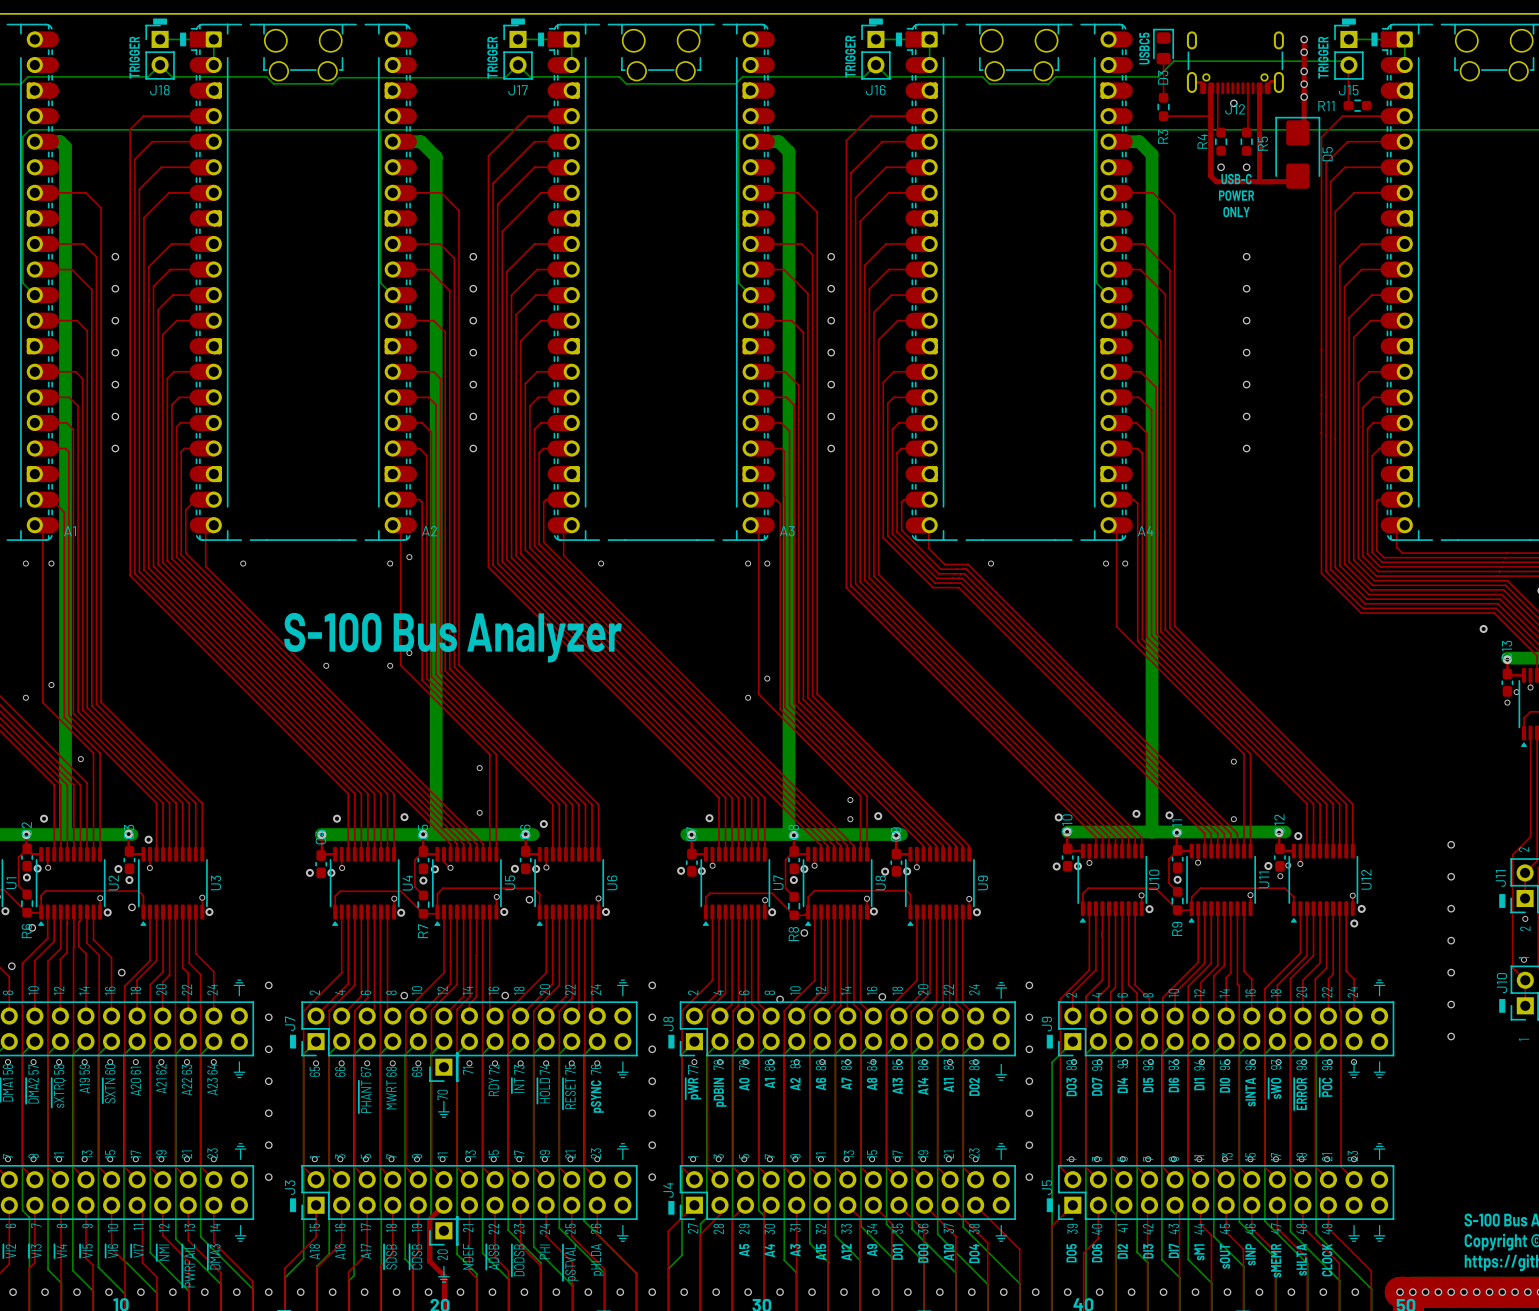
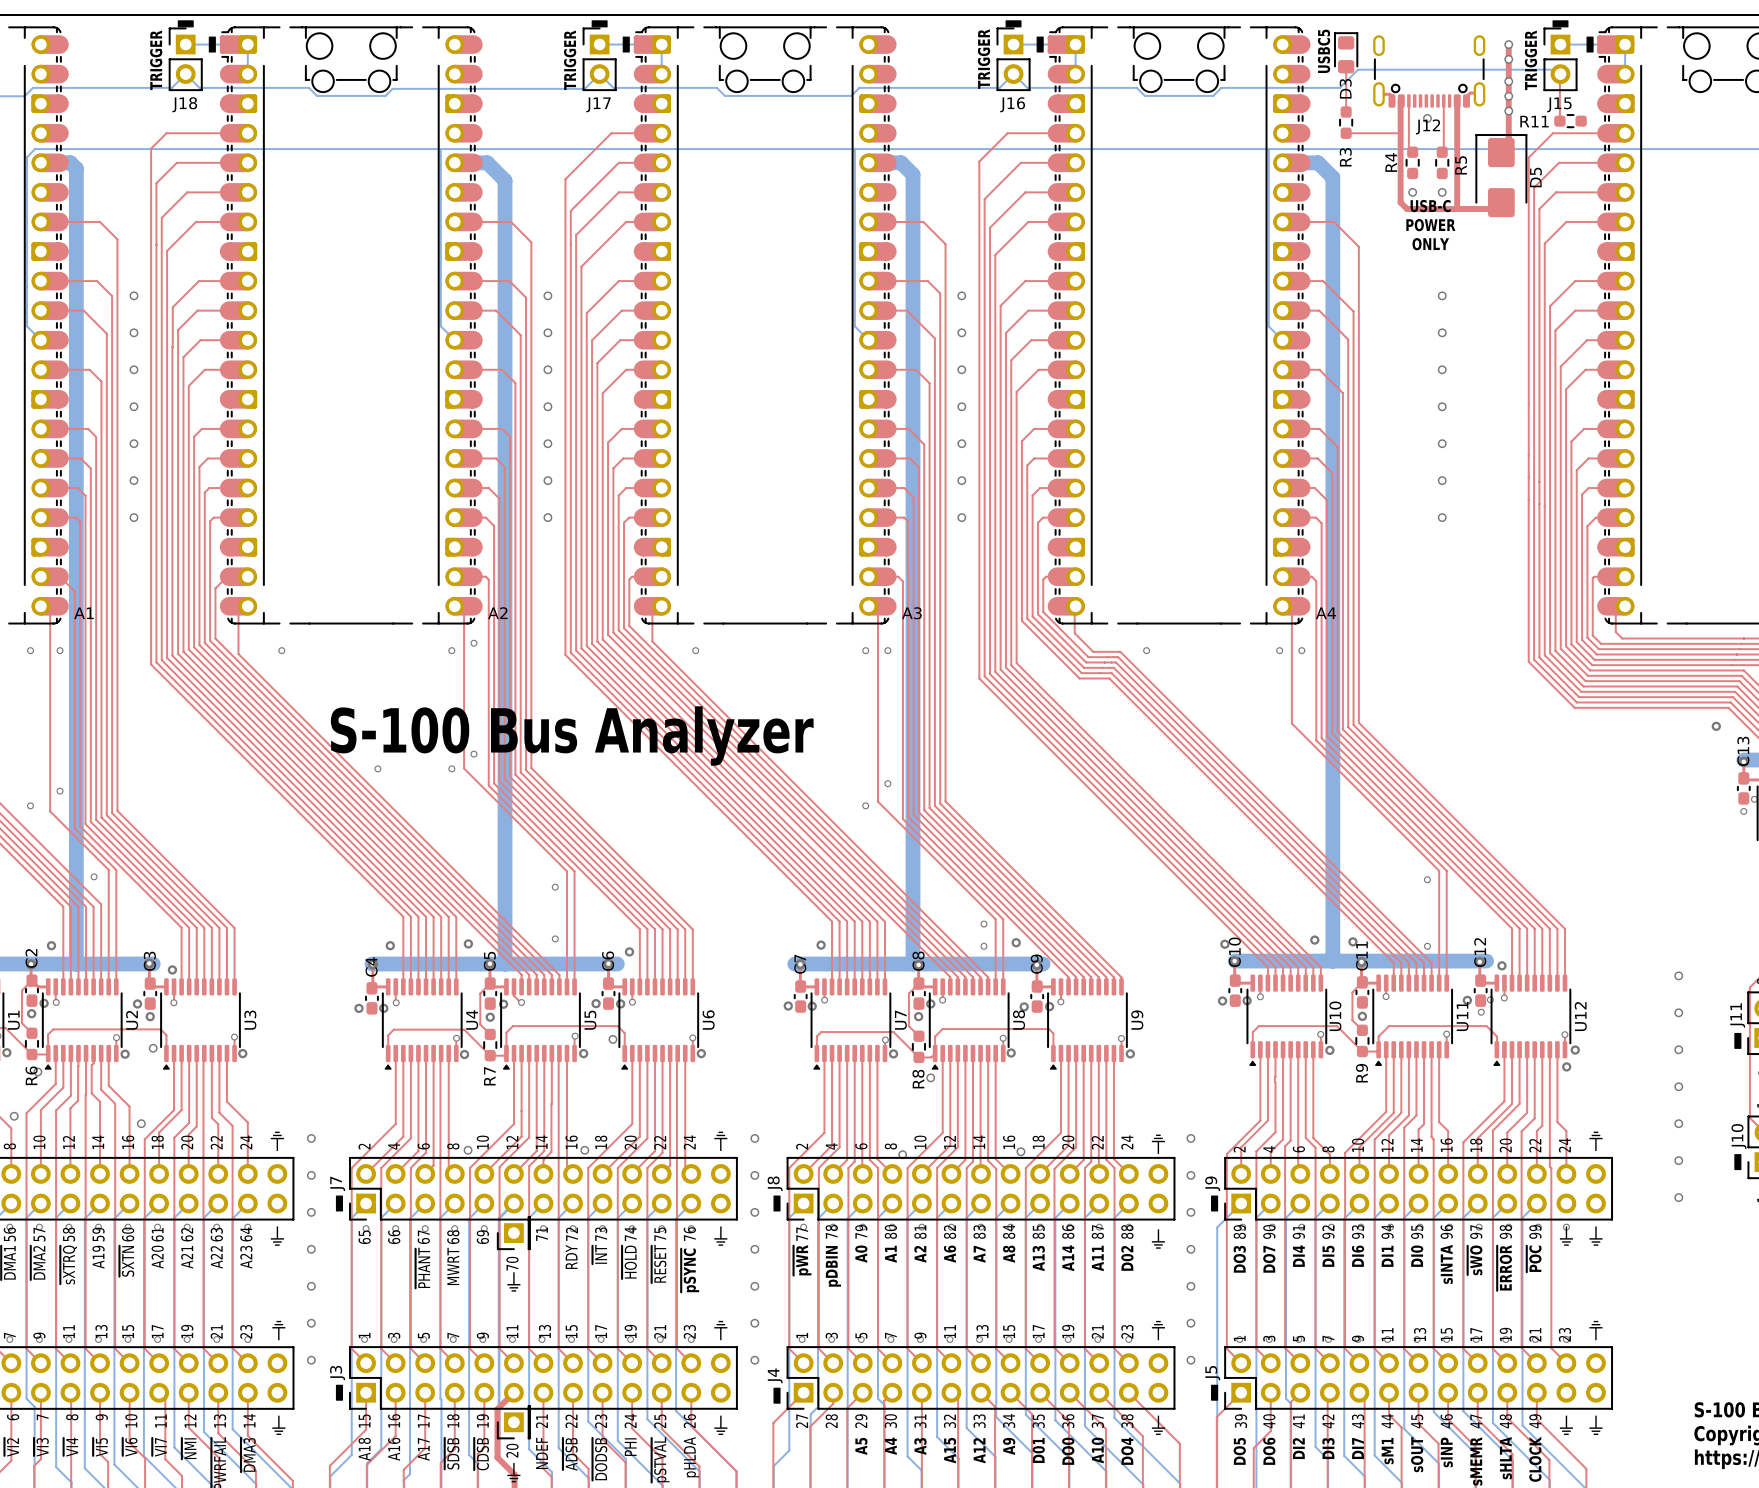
text: pSYNC (597, 1096) -> ~{pSYNC} (690, 1270)

